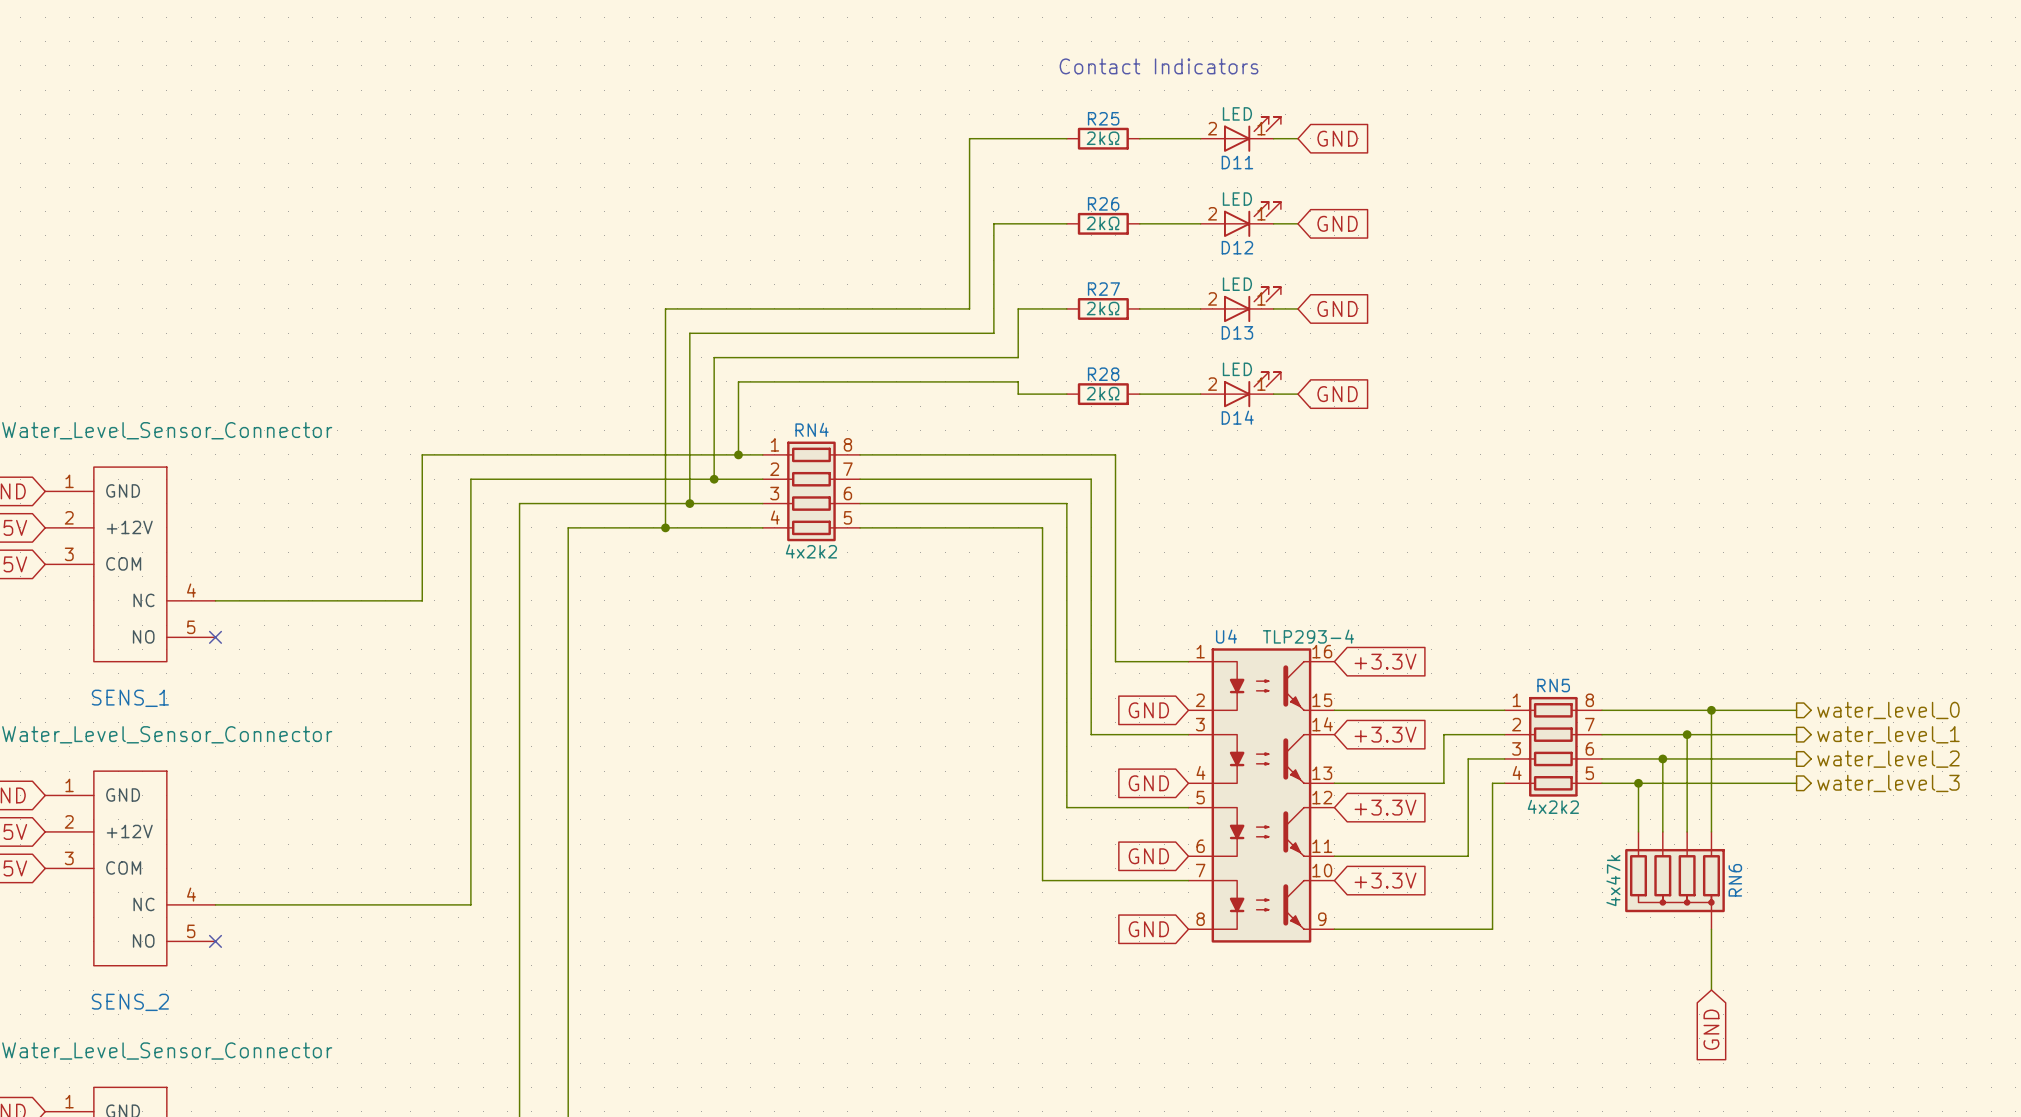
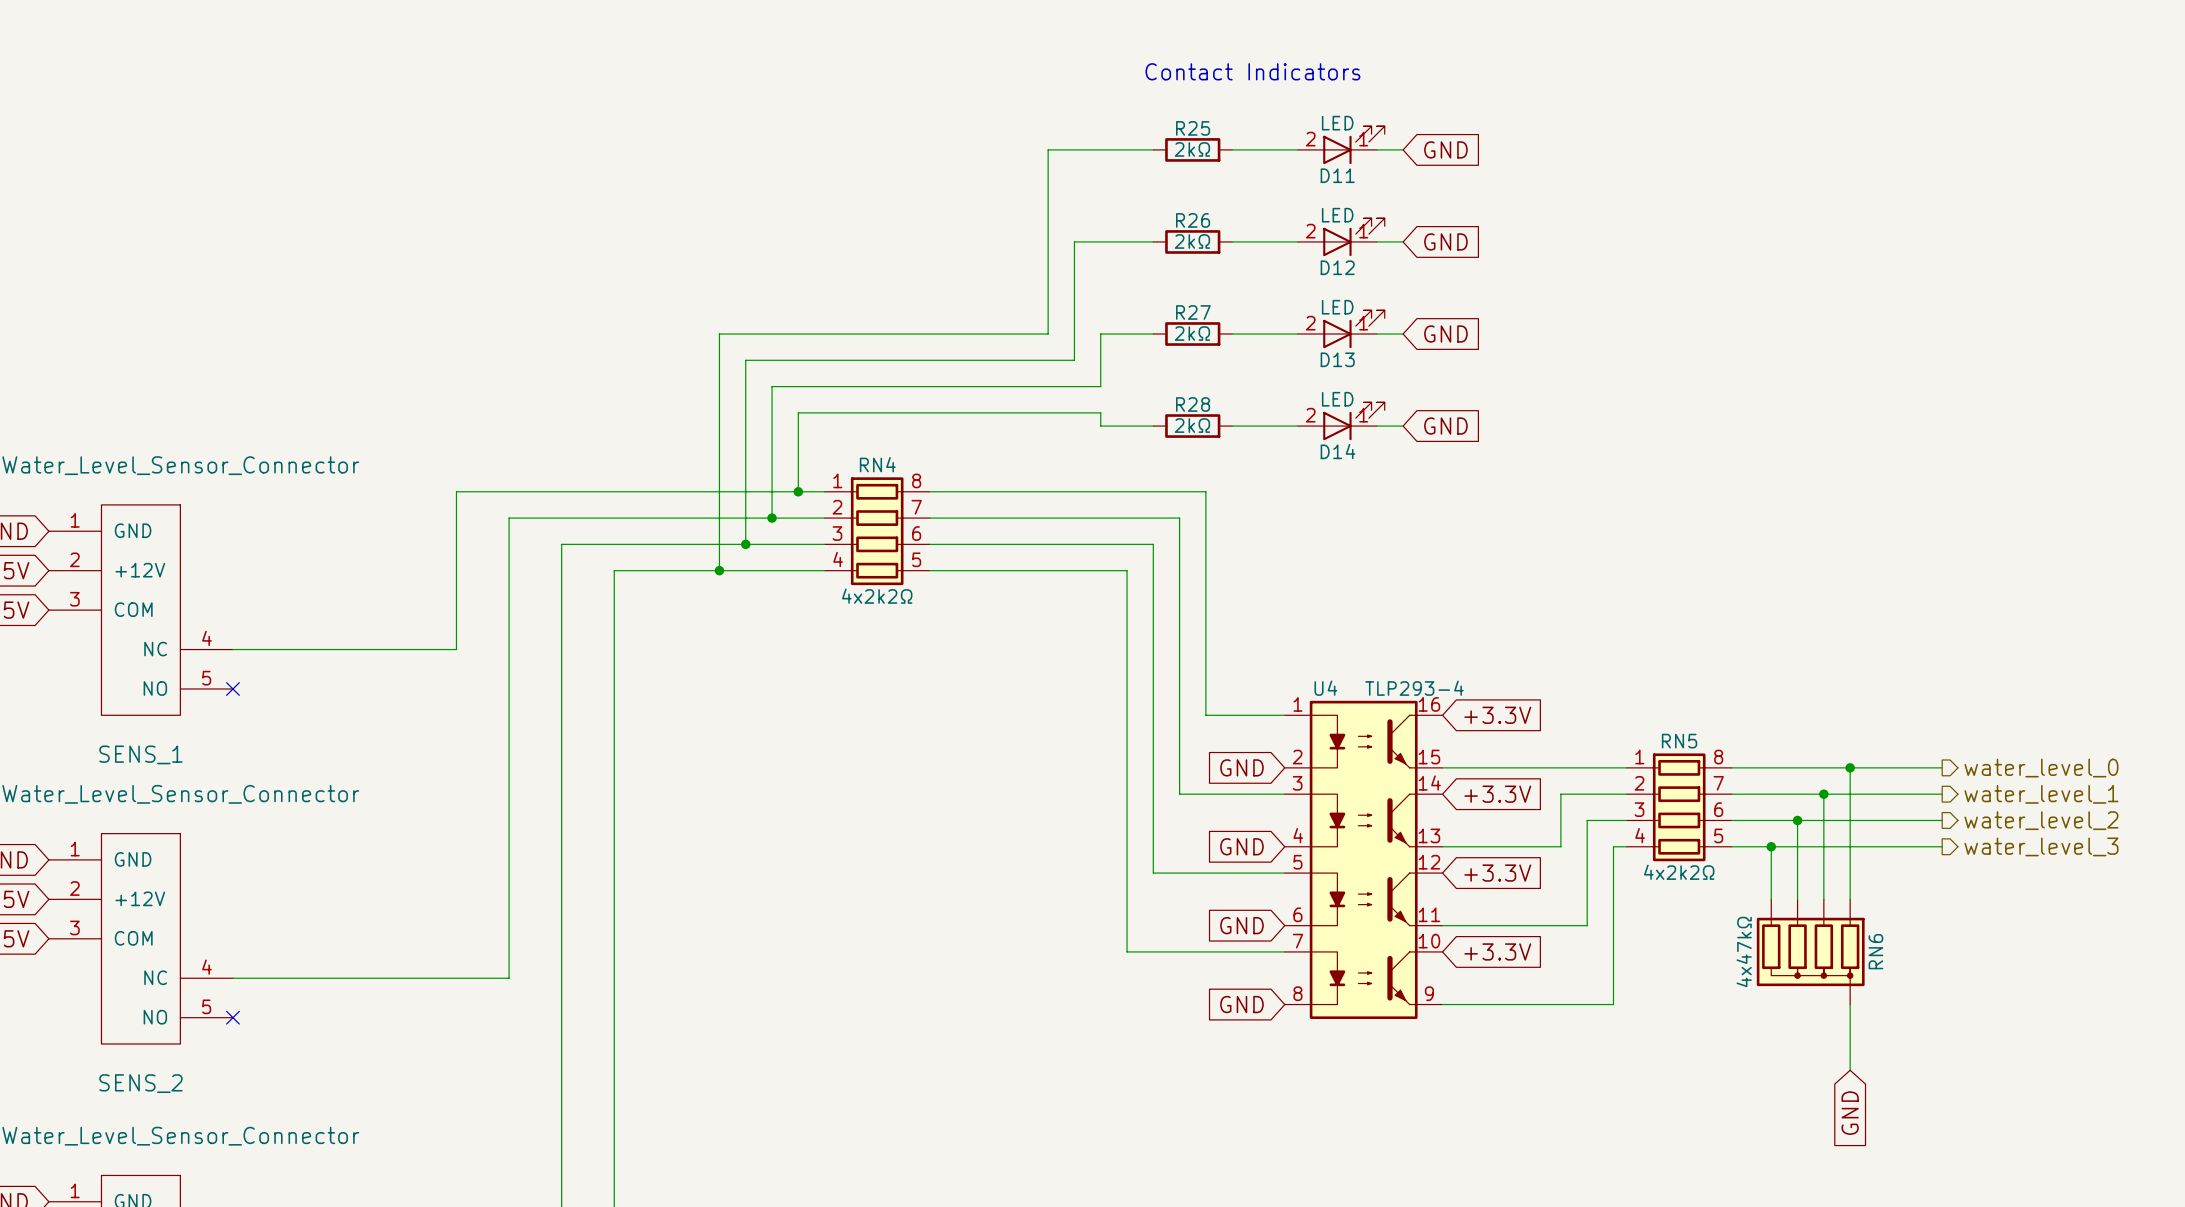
RN4 value: 4x2k2 (811, 551) -> 4x2k2Ω (877, 596)
RN5 value: 4x2k2 (1553, 806) -> 4x2k2Ω (1679, 872)
RN6 value: 4x47k (1613, 880) -> 4x47kΩ (1744, 951)

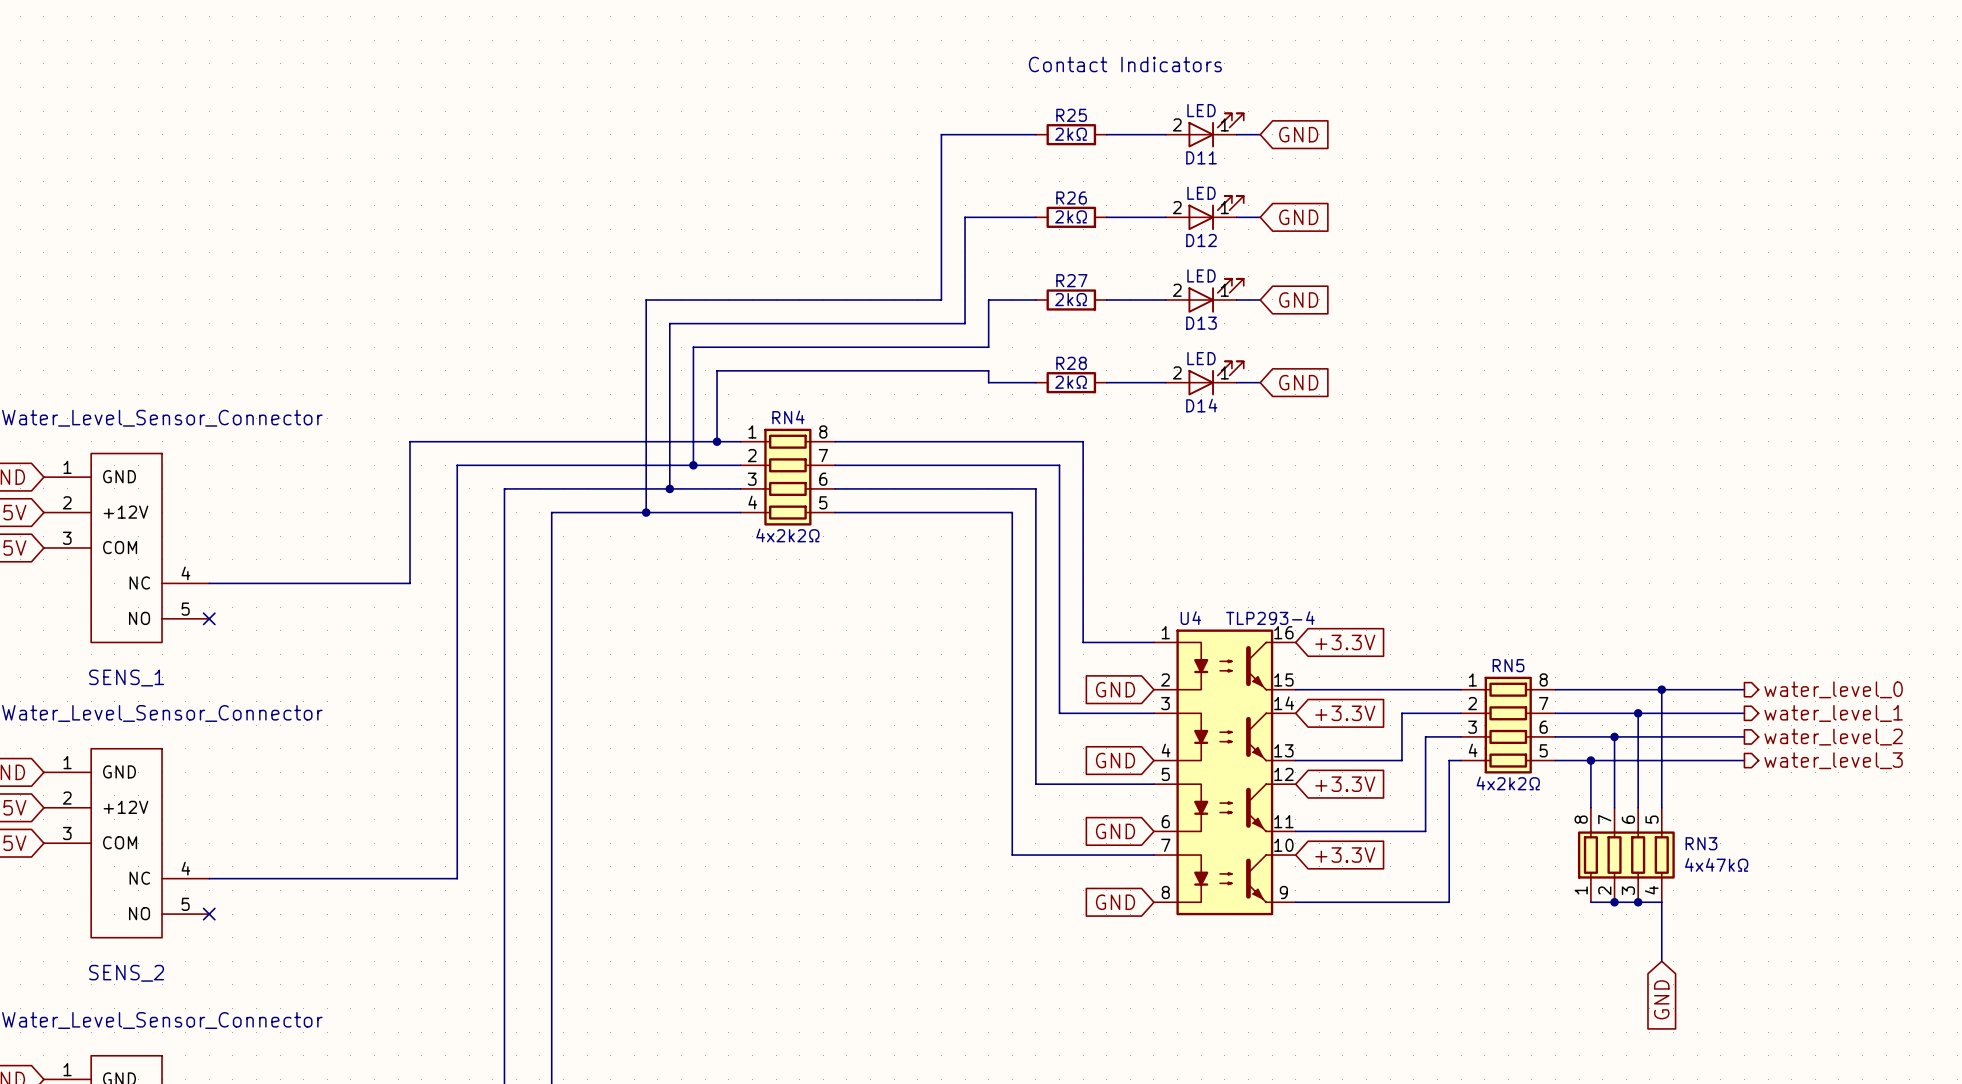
RN6: 4x47kΩ (1810, 951) -> none
RN3: none -> 4x47kΩ (1626, 855)
wire: none -> (1590, 902) (1661, 902)
junction: none -> (1614, 902)
junction: none -> (1638, 902)

